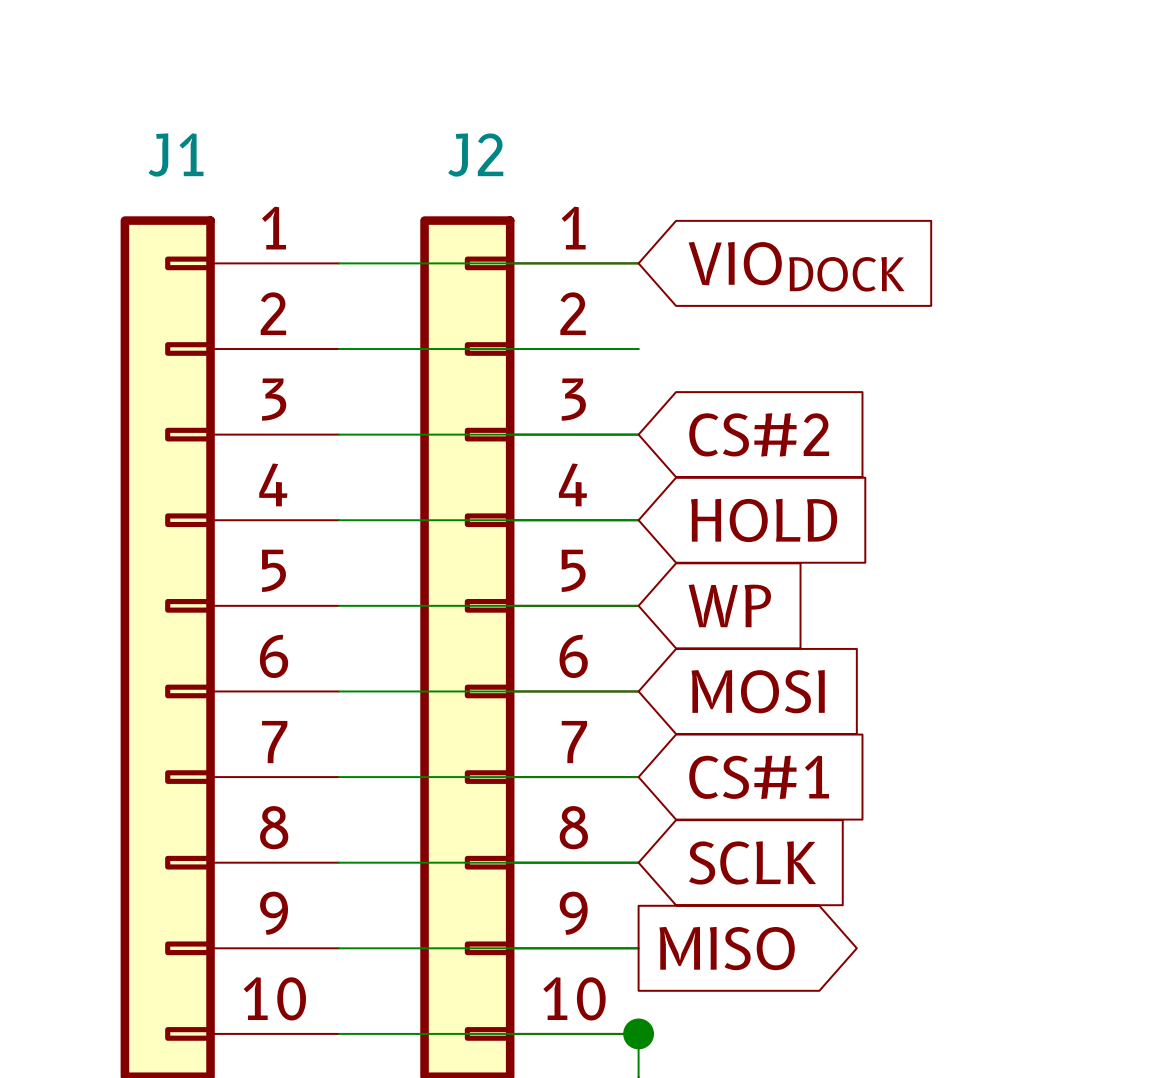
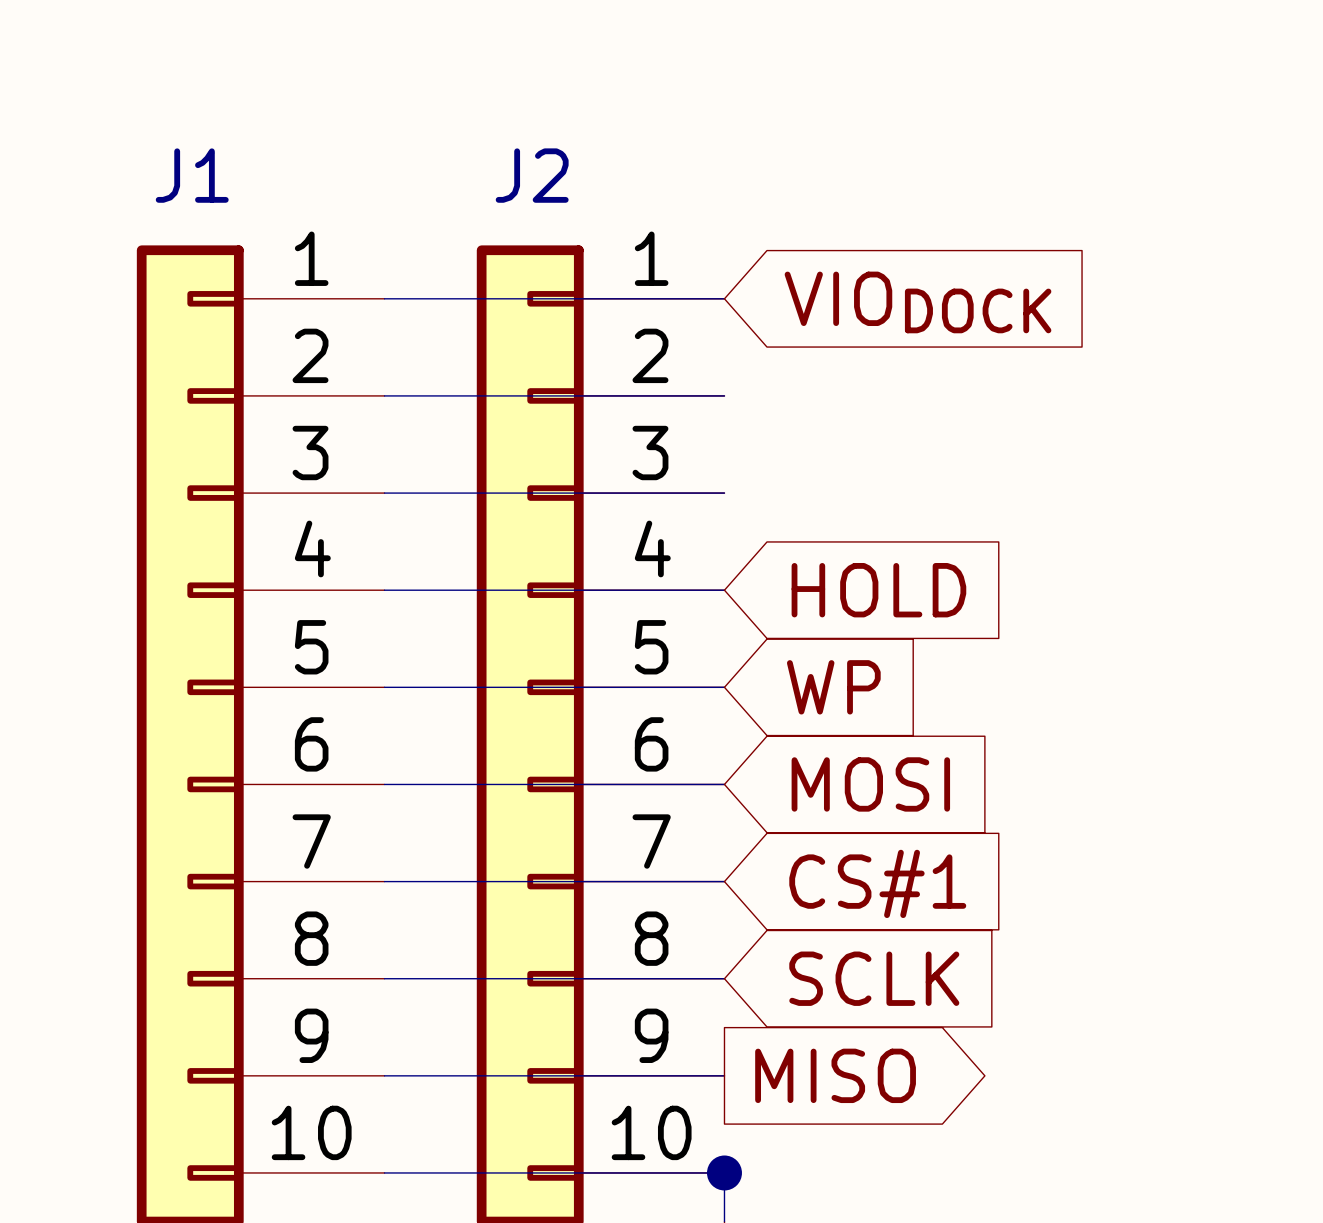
global label: CS#2 (759, 434) -> none

